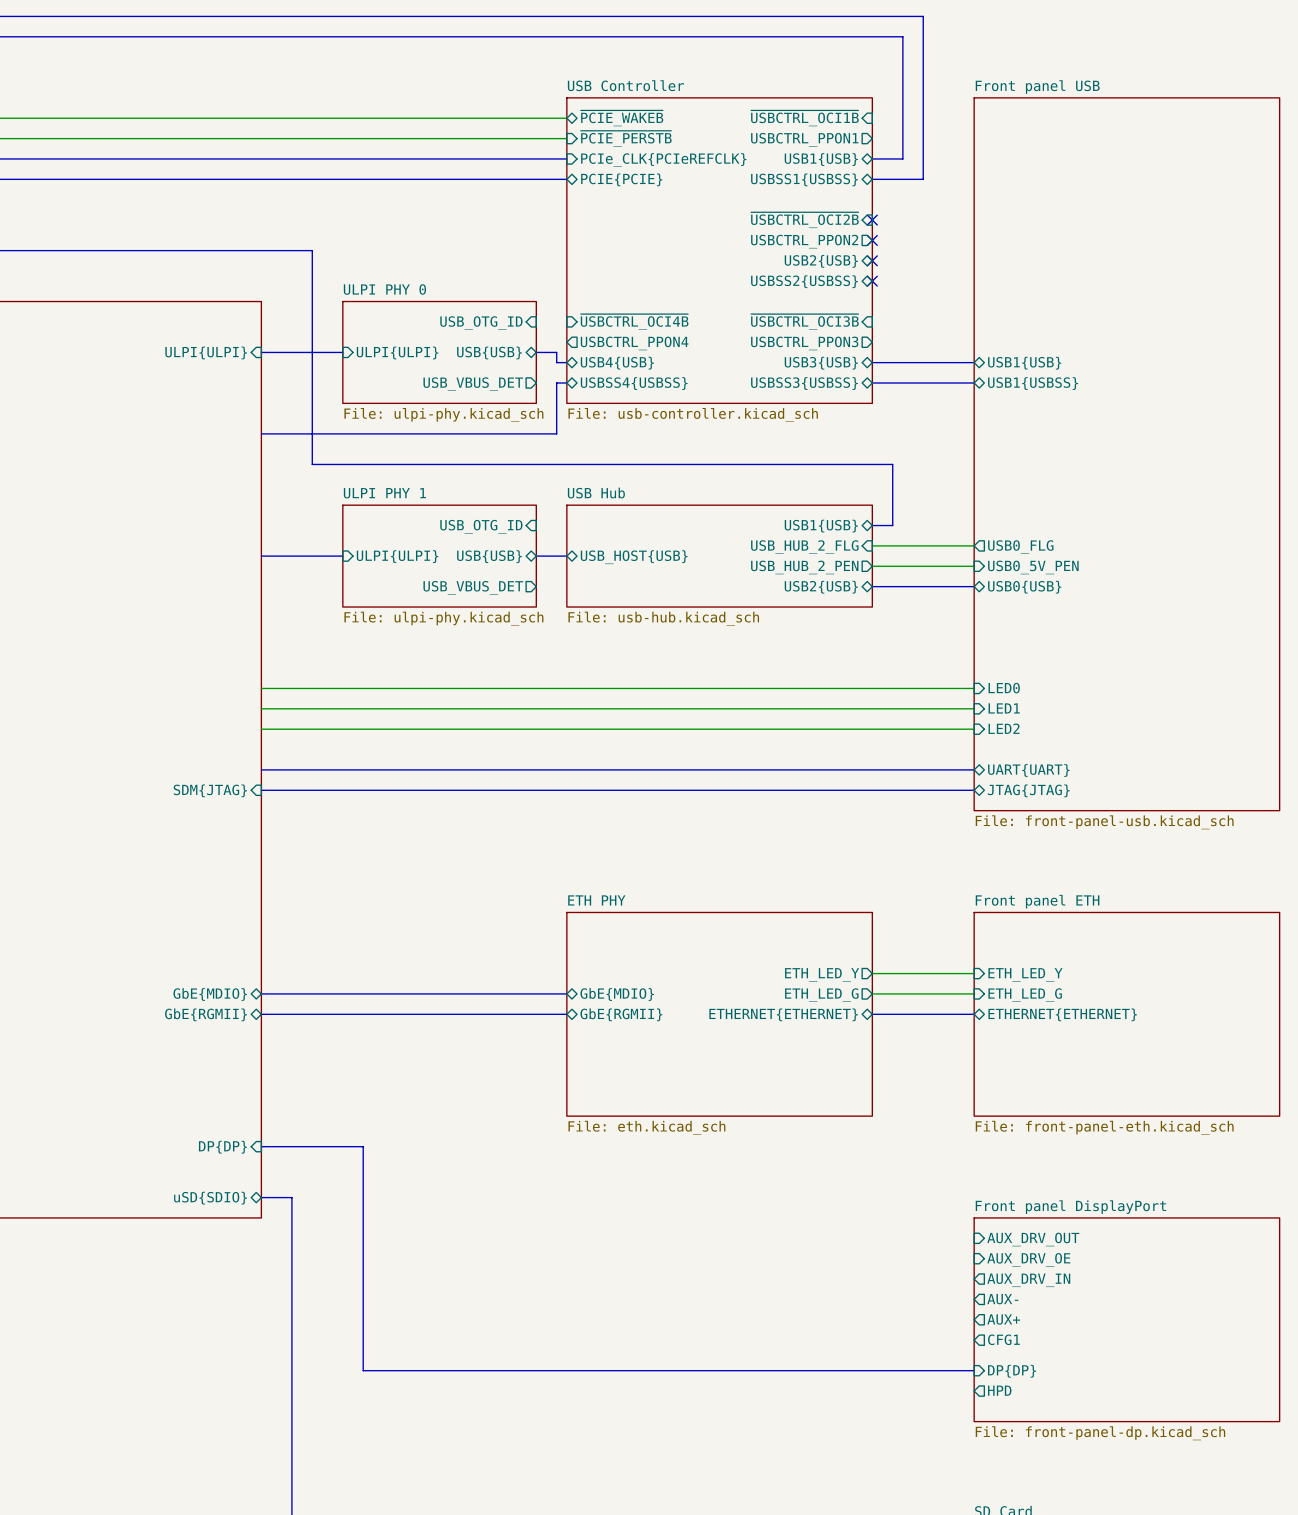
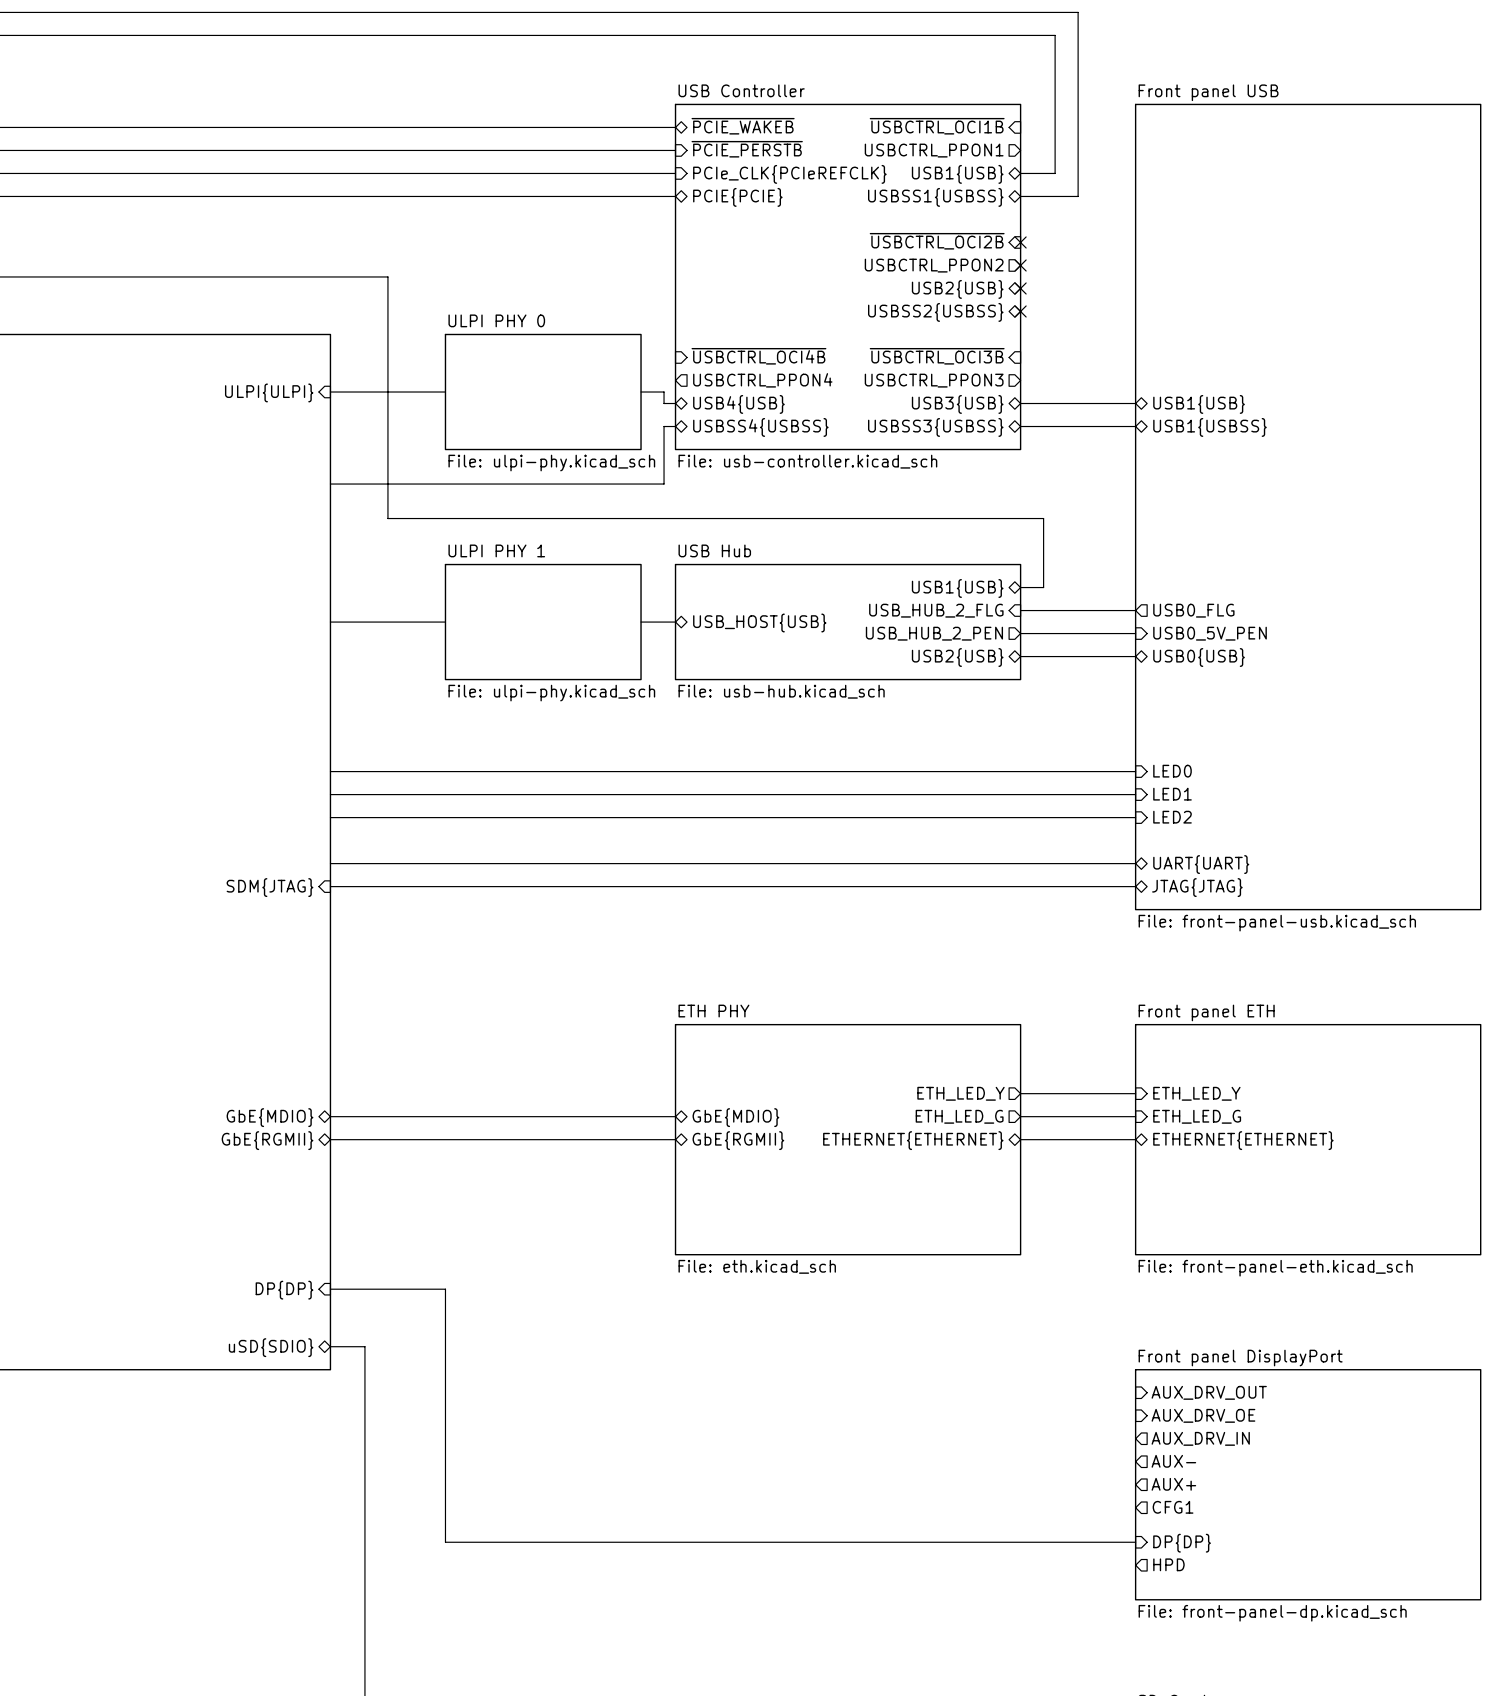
sheet ULPI PHY 0 shape: [342, 300, 537, 404] -> [444, 333, 642, 451]
sheet pin: USB_OTG_ID (481, 323) -> none
bus: none -> (422, 392) (445, 392)
sheet pin: ULPI{ULPI} (397, 352) -> none
sheet pin: USB{USB} (489, 352) -> none
sheet pin: USB_VBUS_DET (473, 384) -> none
sheet ULPI PHY 1 shape: [342, 504, 537, 608] -> [444, 563, 642, 681]
sheet pin: USB_OTG_ID (481, 526) -> none
bus: none -> (422, 622) (445, 622)
sheet pin: ULPI{ULPI} (397, 556) -> none
sheet pin: USB{USB} (489, 556) -> none
sheet pin: USB_VBUS_DET (473, 587) -> none

